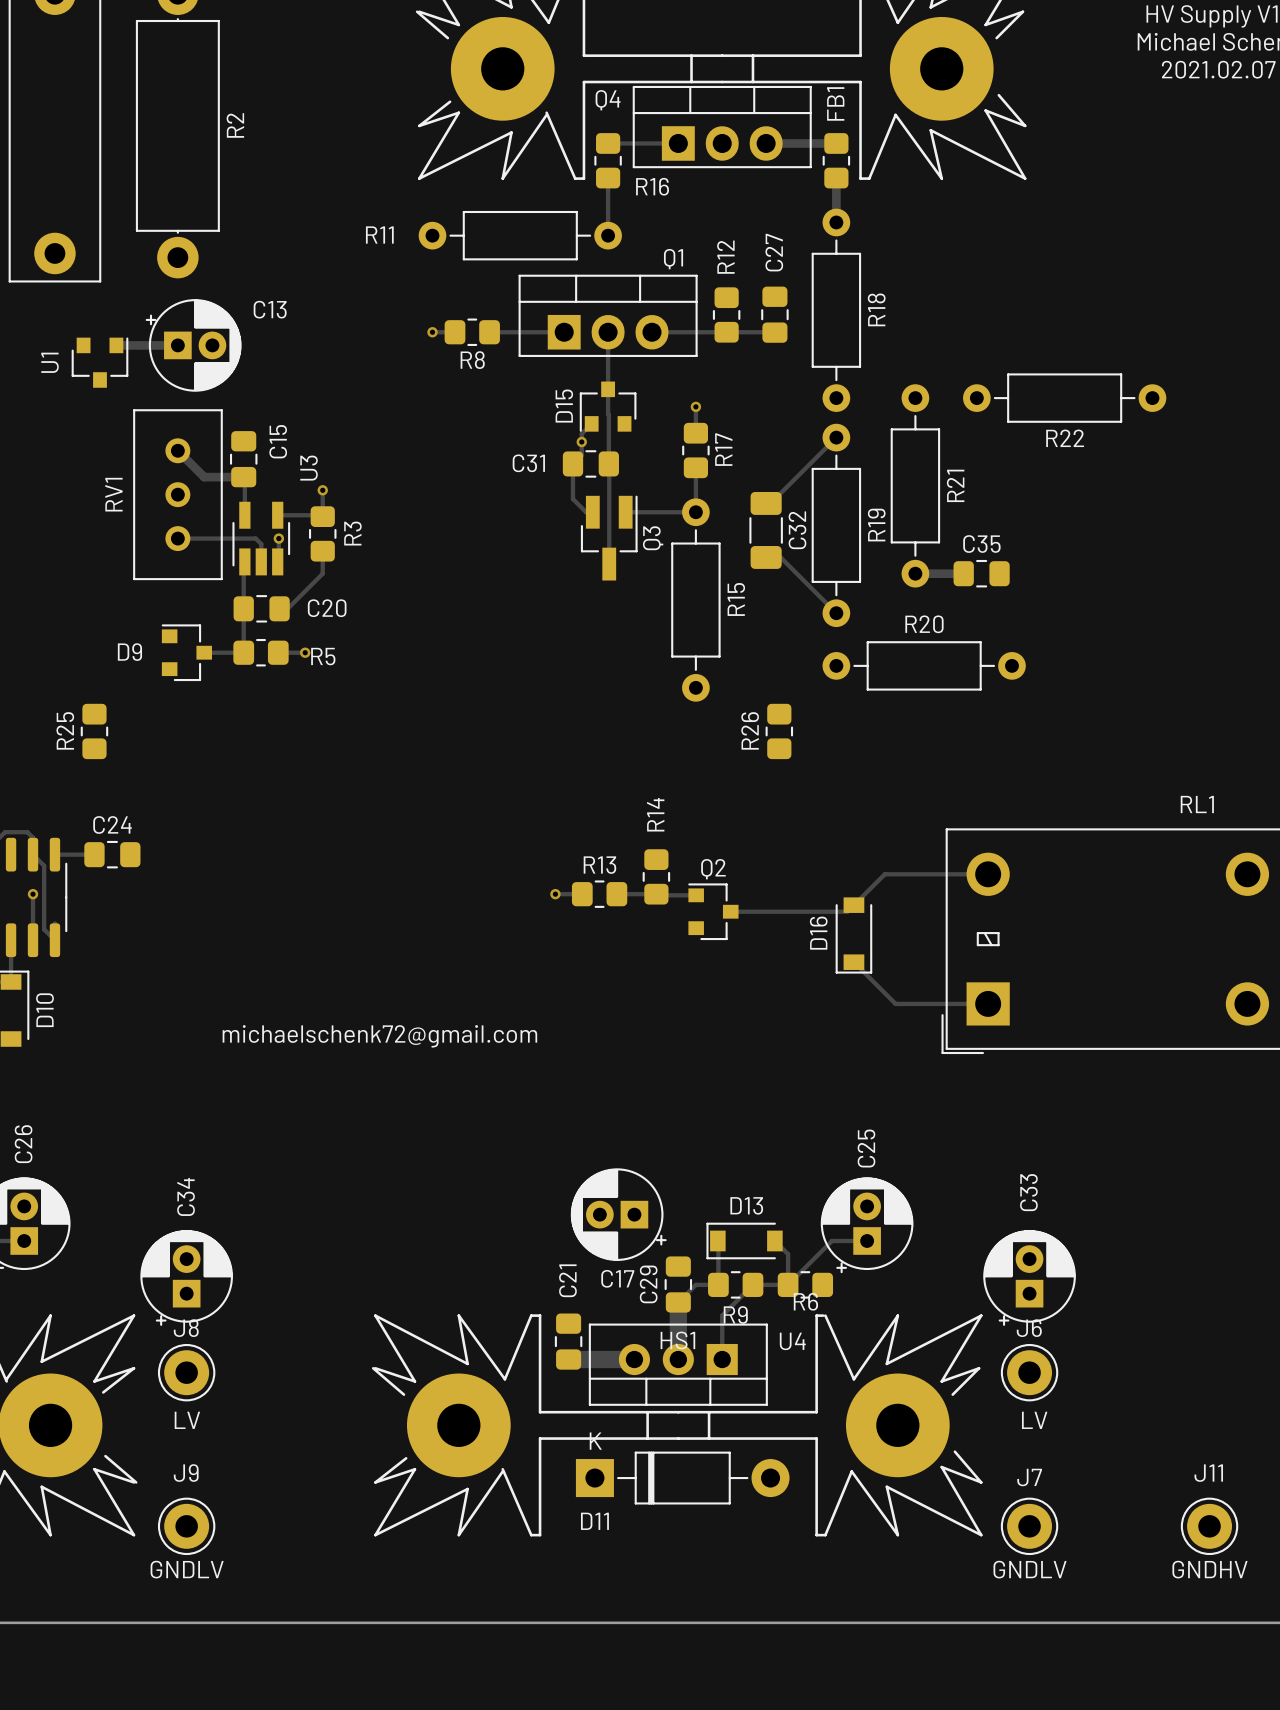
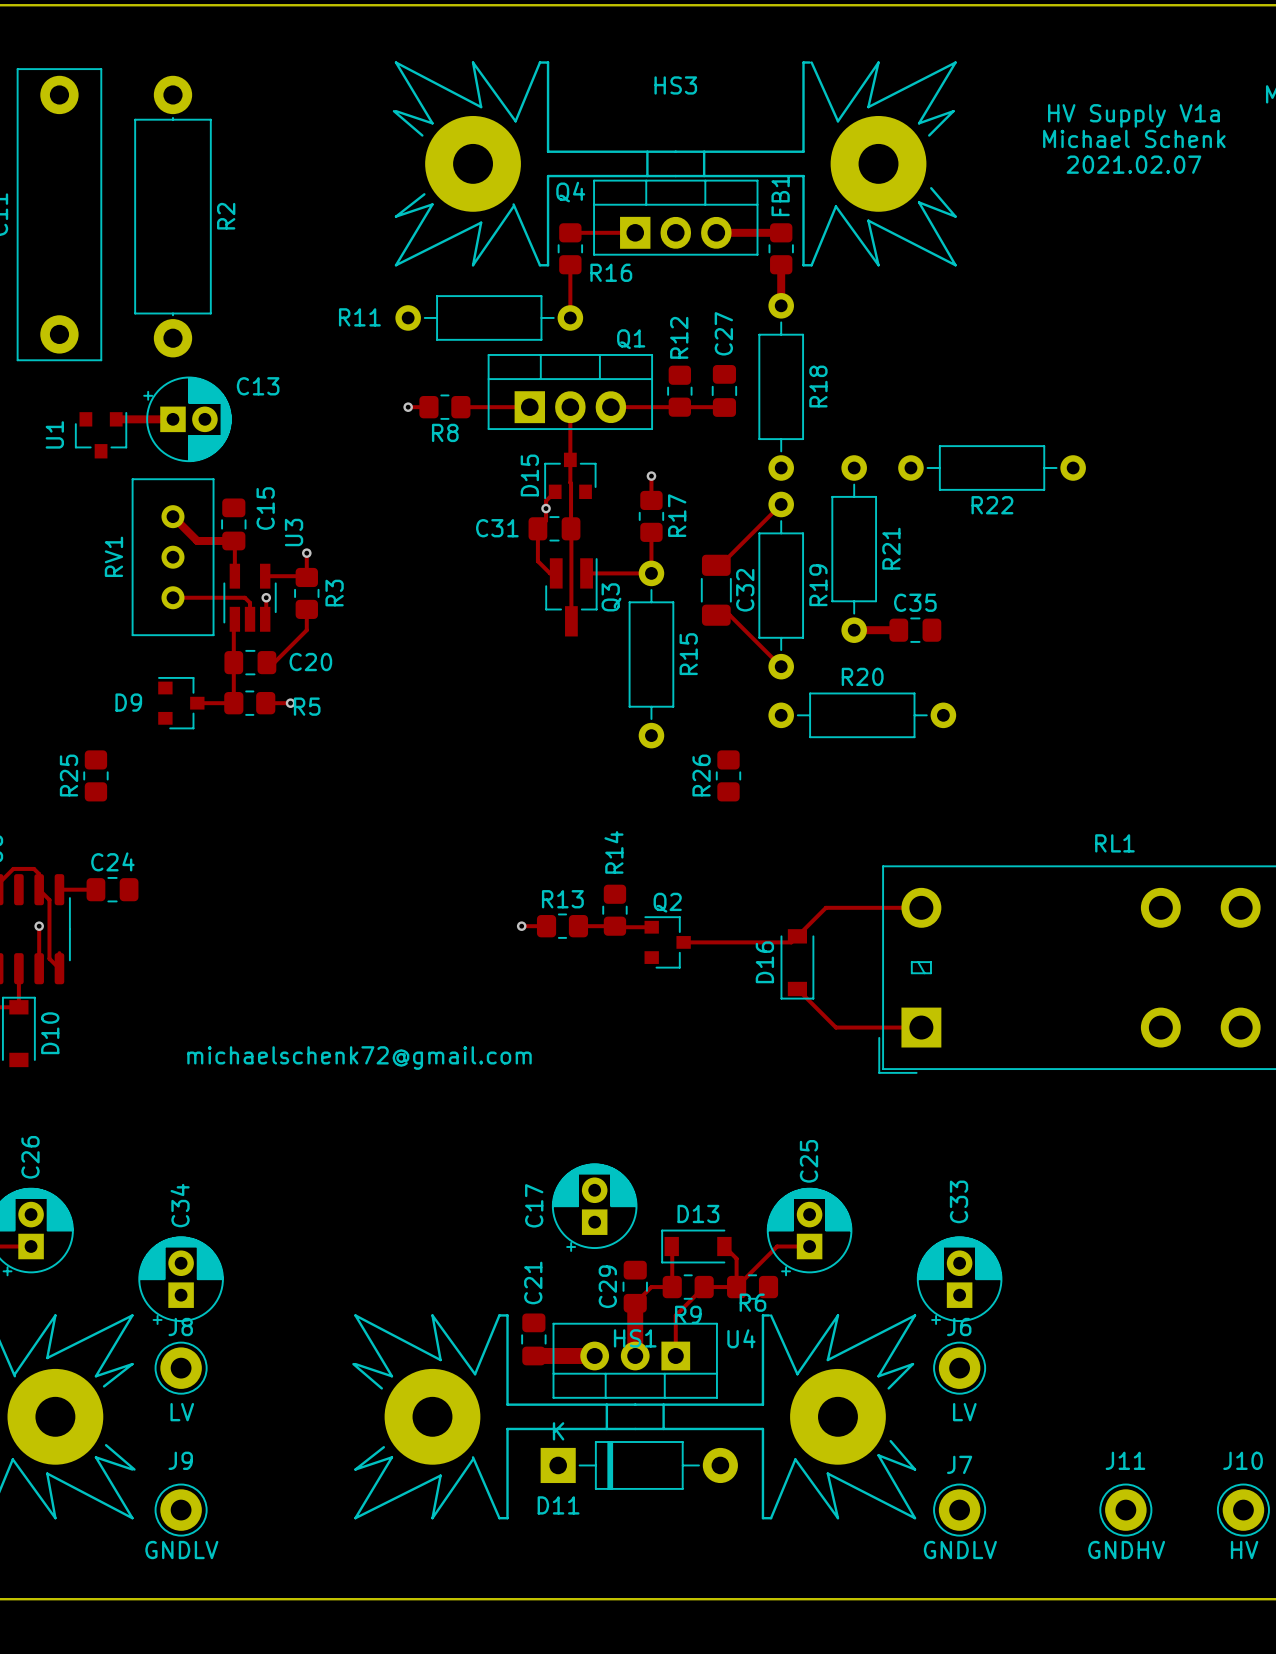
C17 rotation: 0° (618, 1214) -> 90° clockwise (594, 1207)

